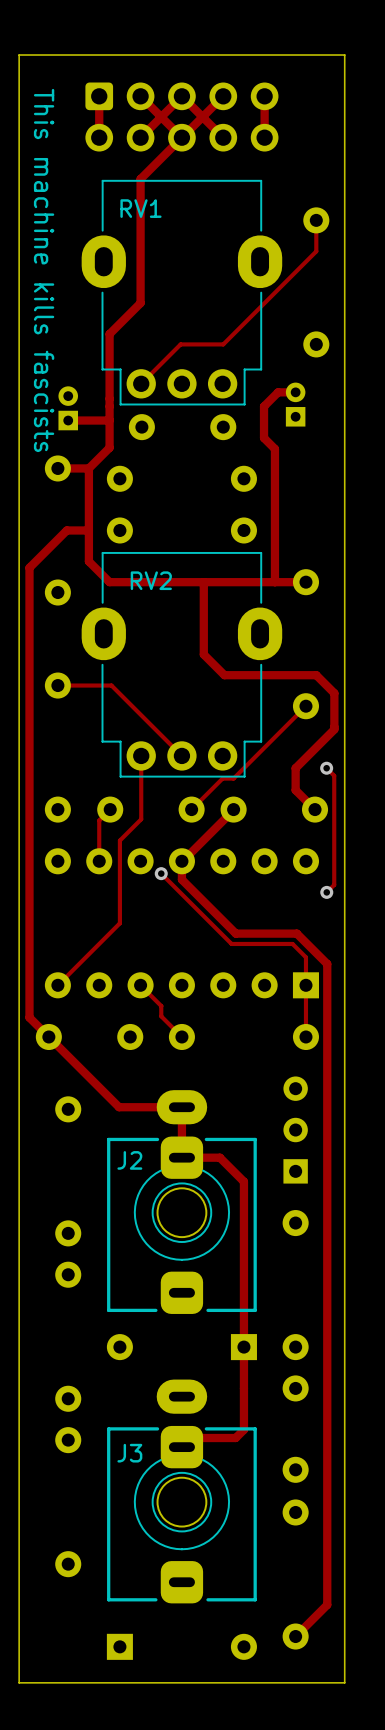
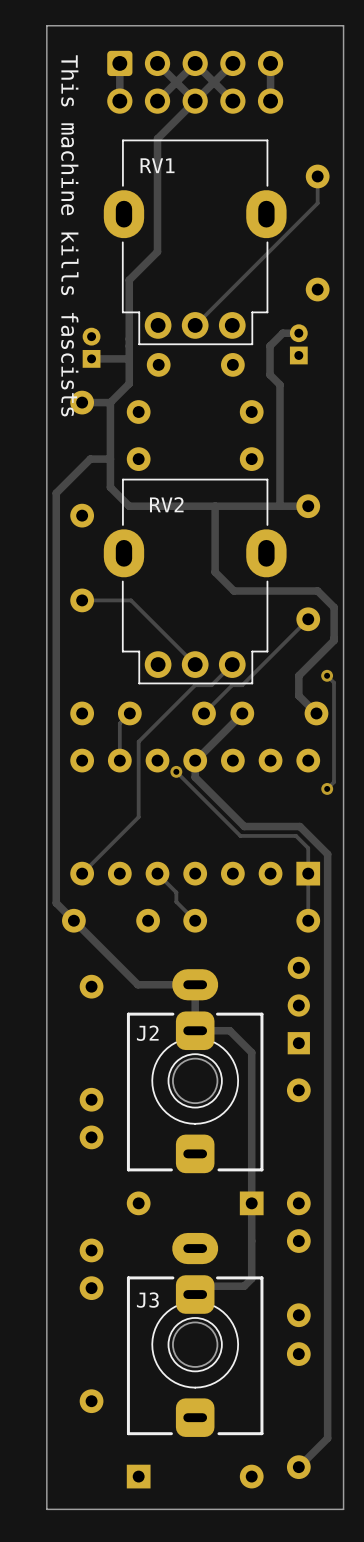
track: (316, 249) (223, 344) (180, 344) (141, 383) -> (317, 203) (195, 325)
track: (141, 755) (141, 819) -> (232, 664) (211, 685) (195, 685) (158, 722)

